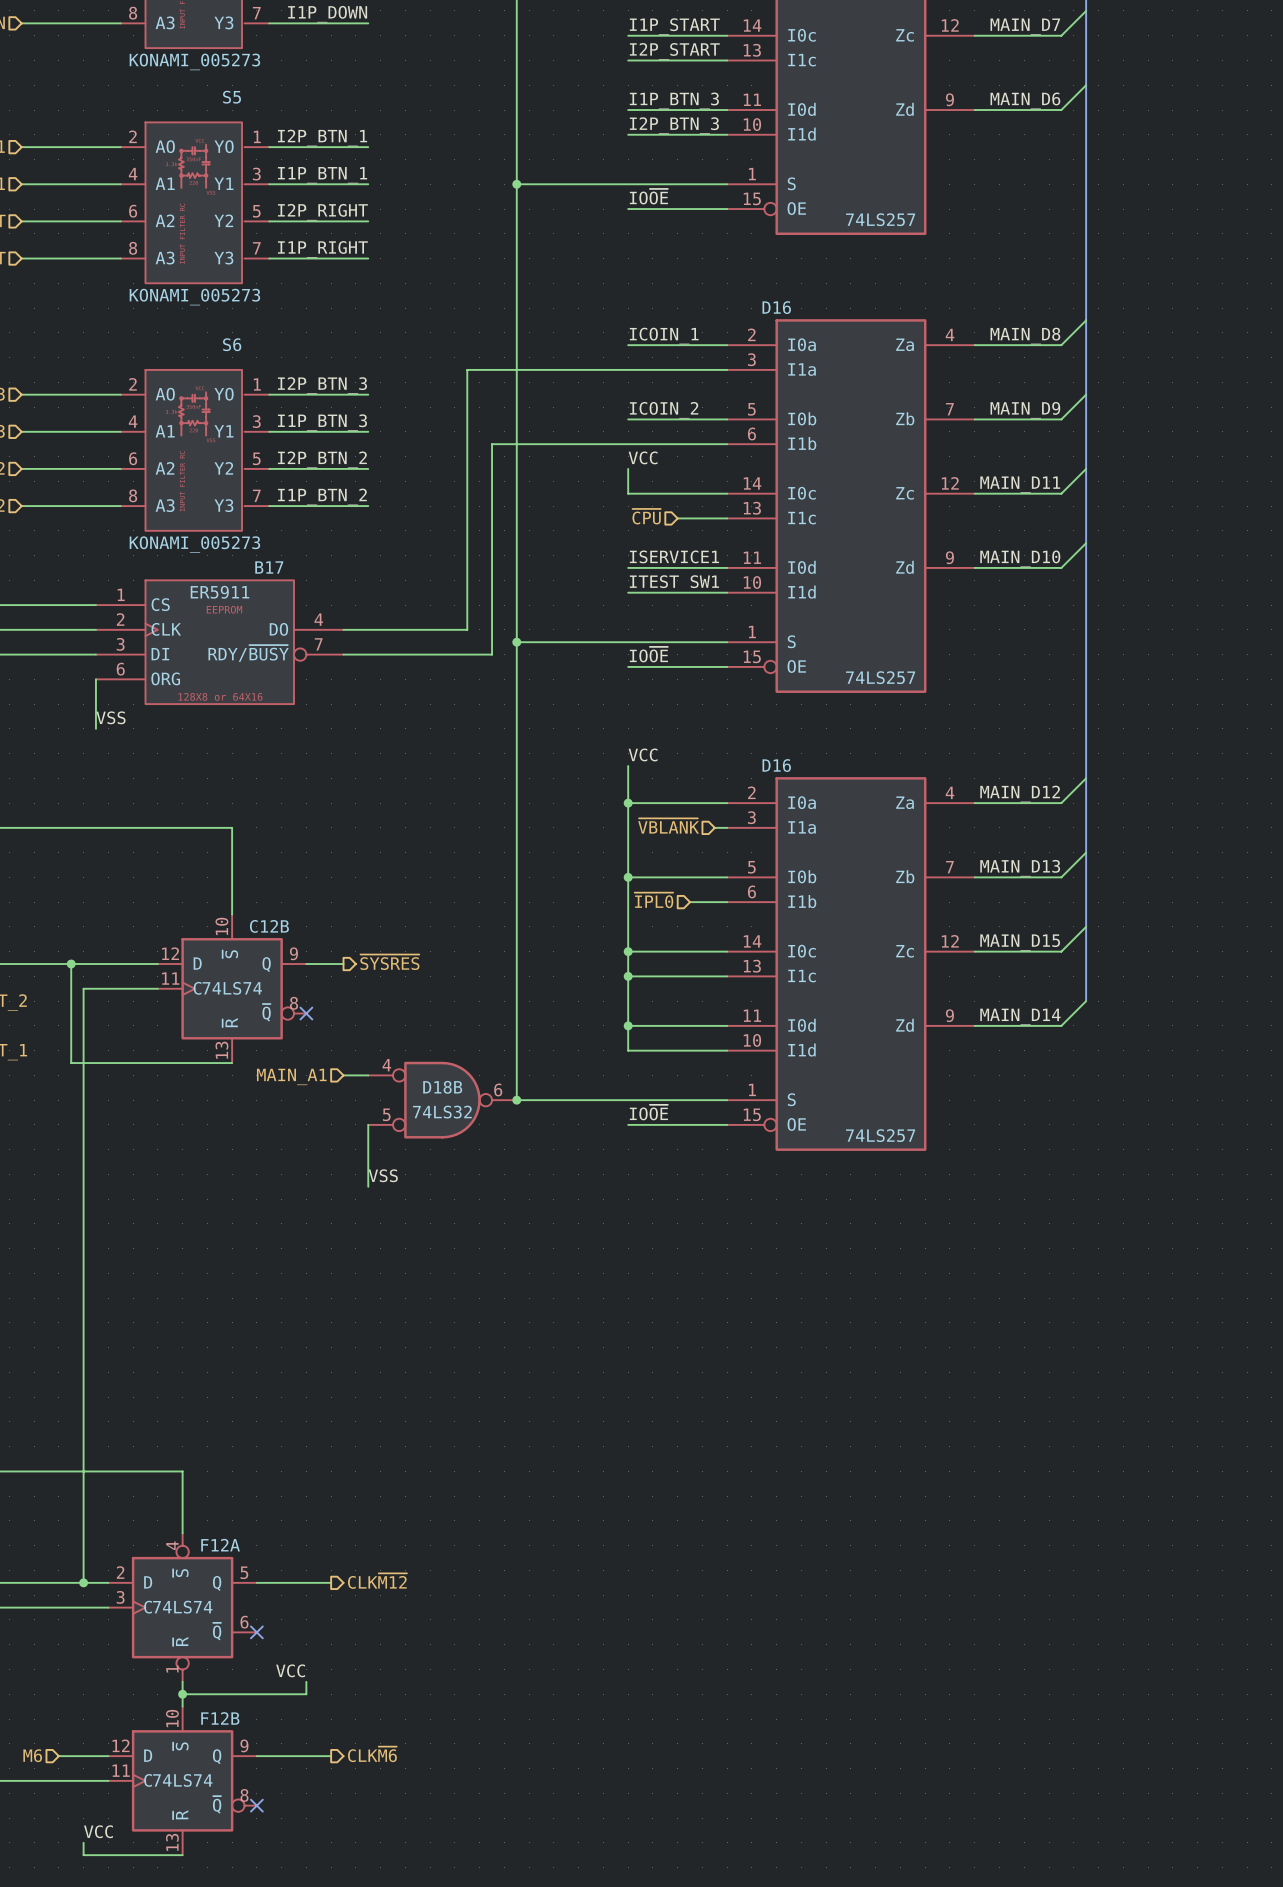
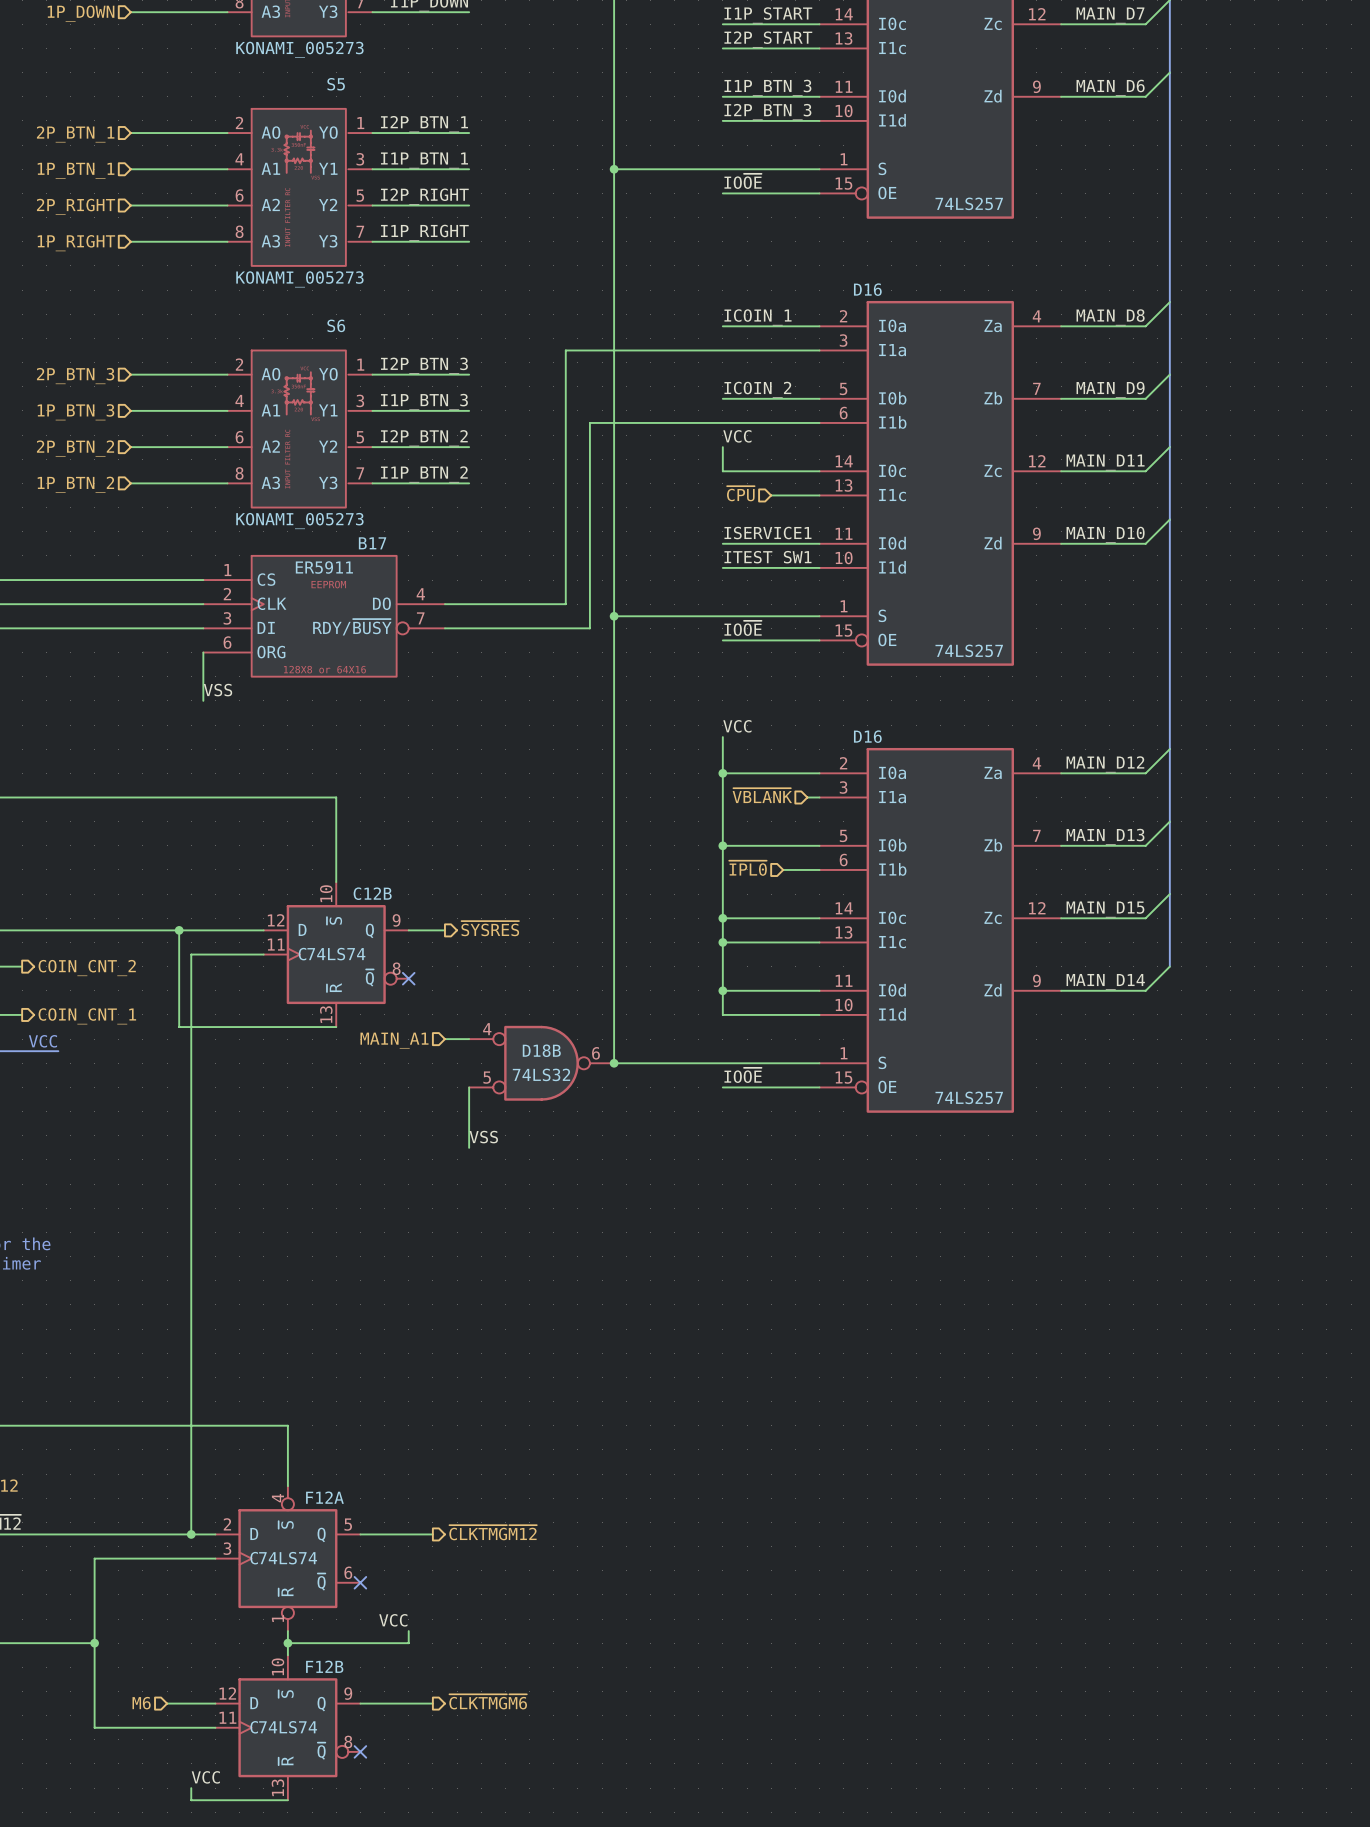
hierarchical label: CLK~{M12} (377, 1581) -> ~{CLKTMG}~{M12} (493, 1532)
hierarchical label: CLK~{M6} (372, 1754) -> ~{CLKTMG}~{M6} (488, 1701)

